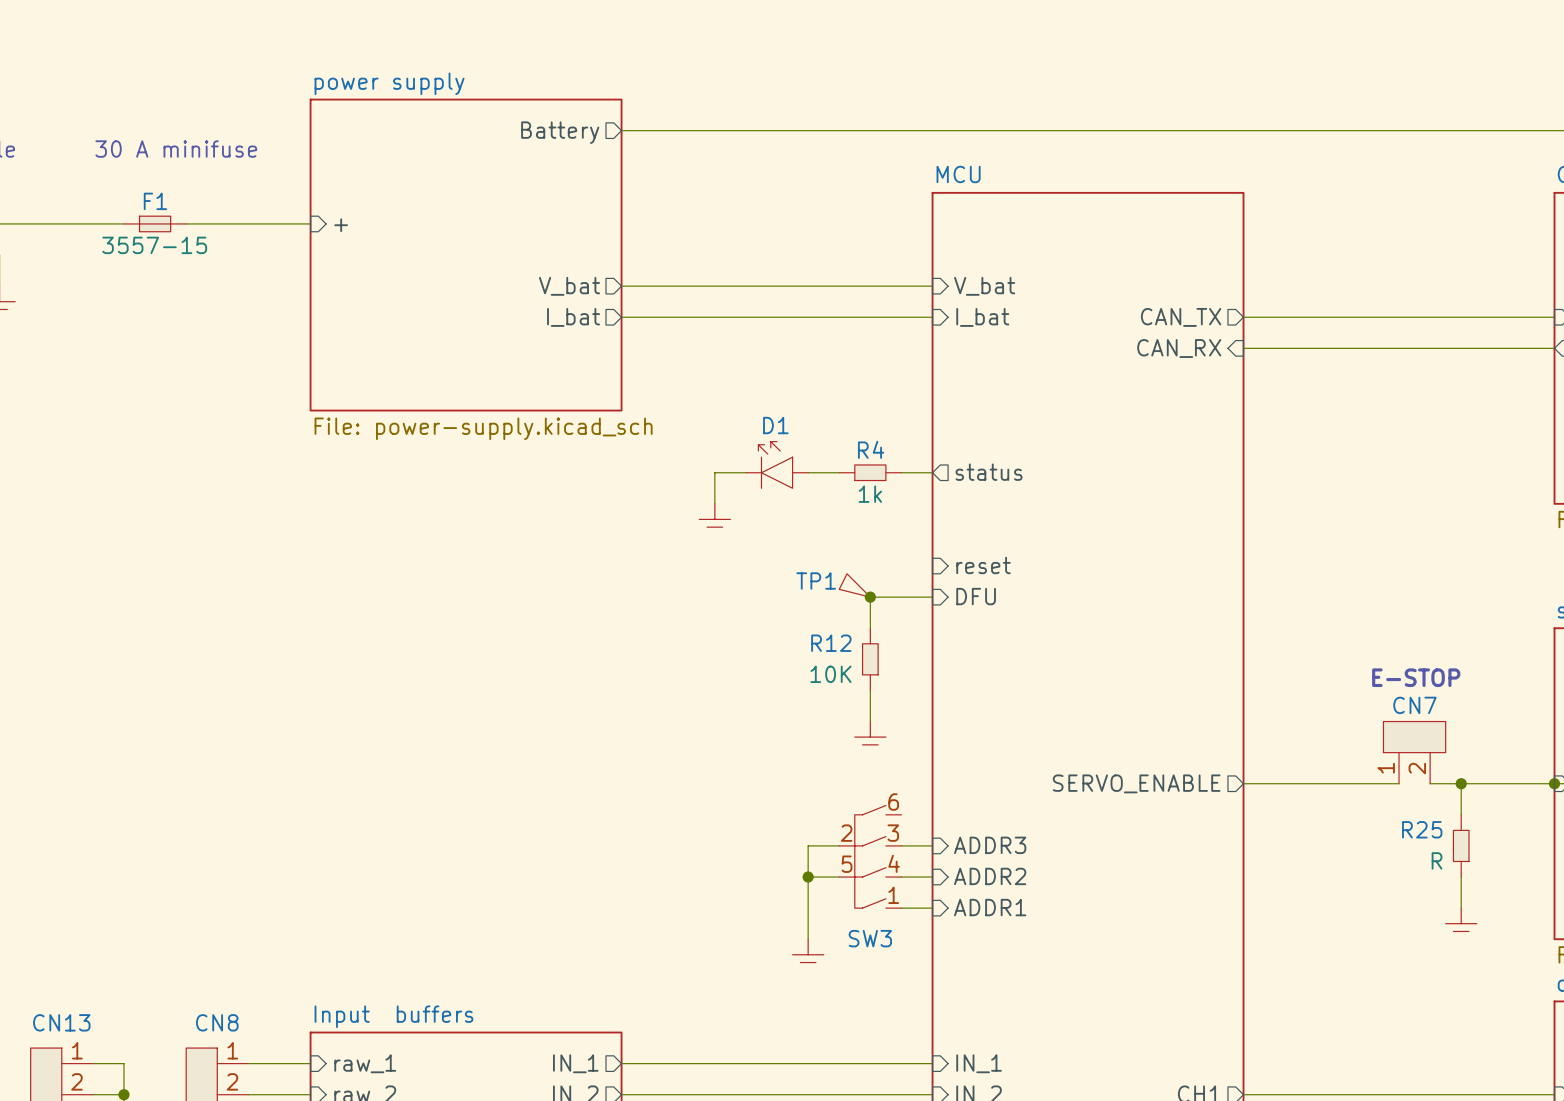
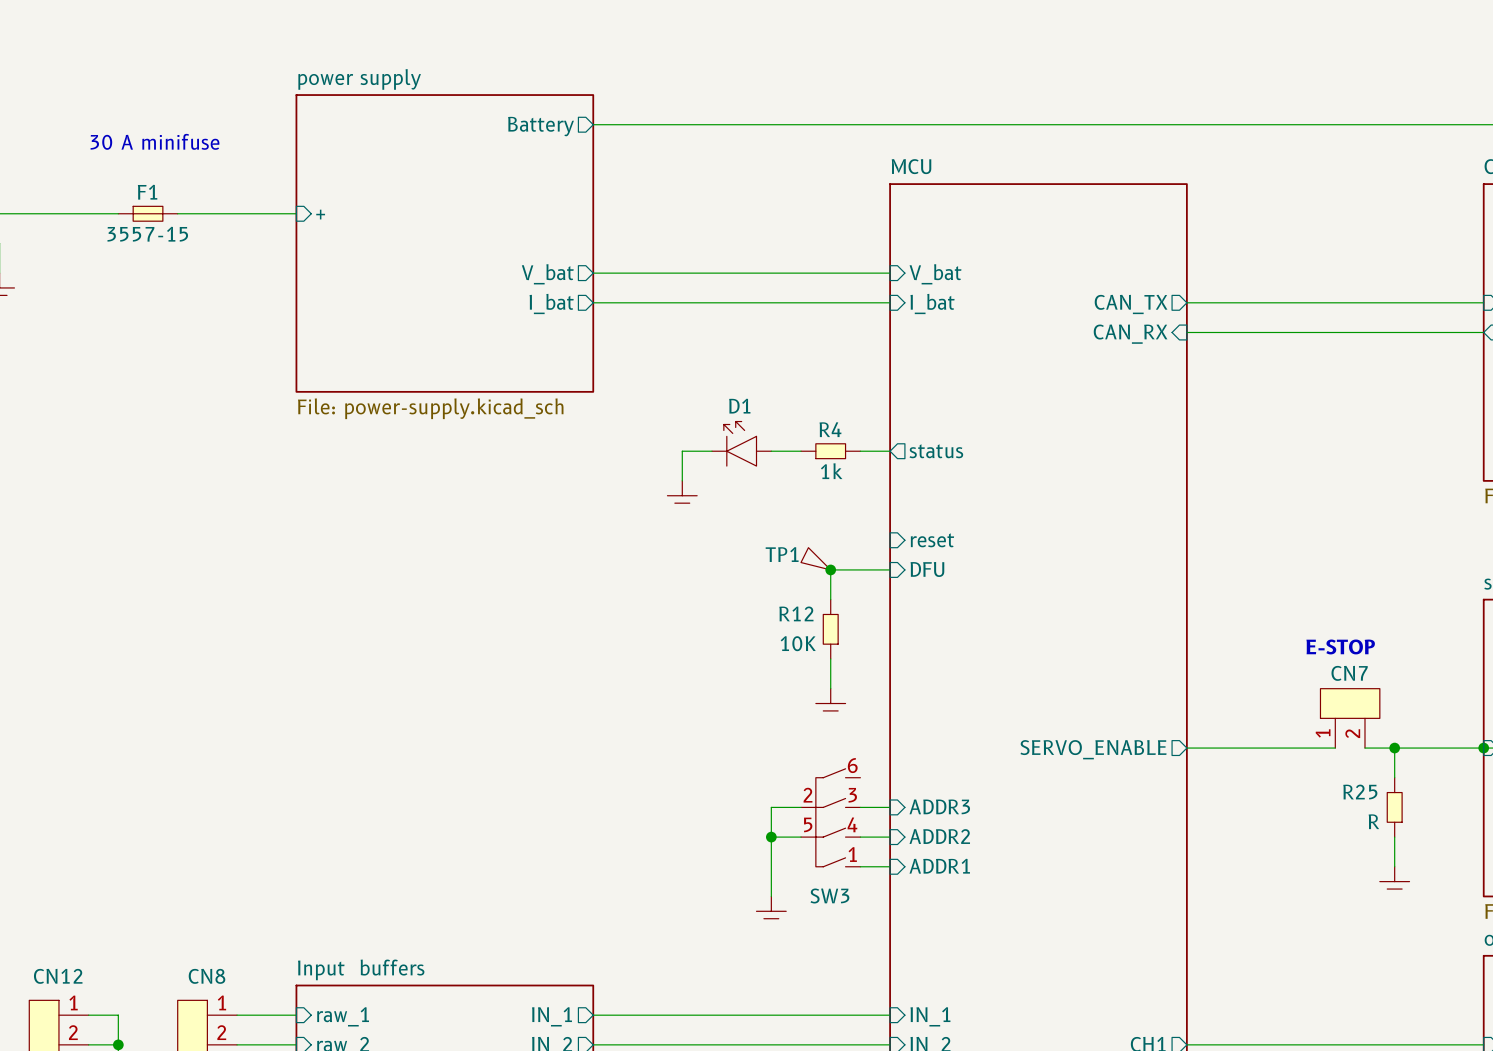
CN13 name: CN13 (61, 1022) -> CN12 (58, 976)

